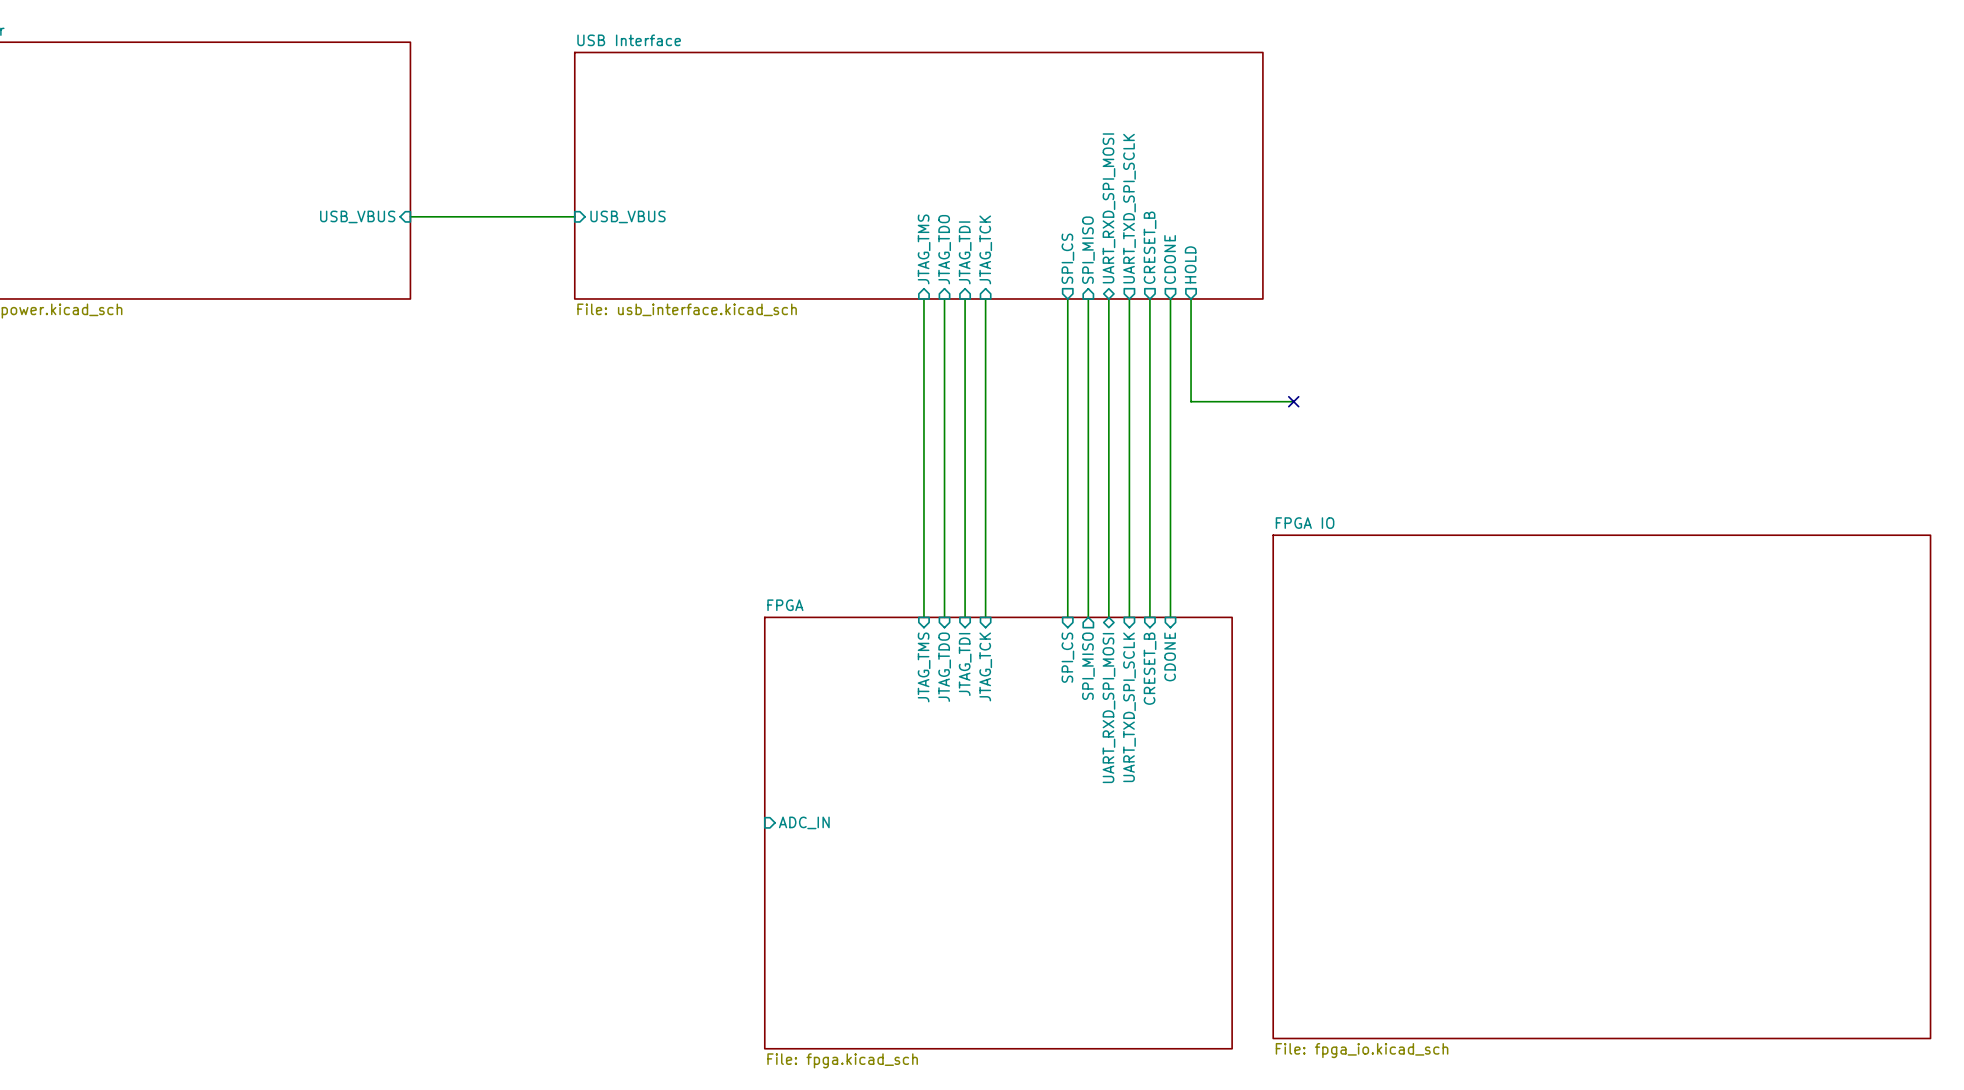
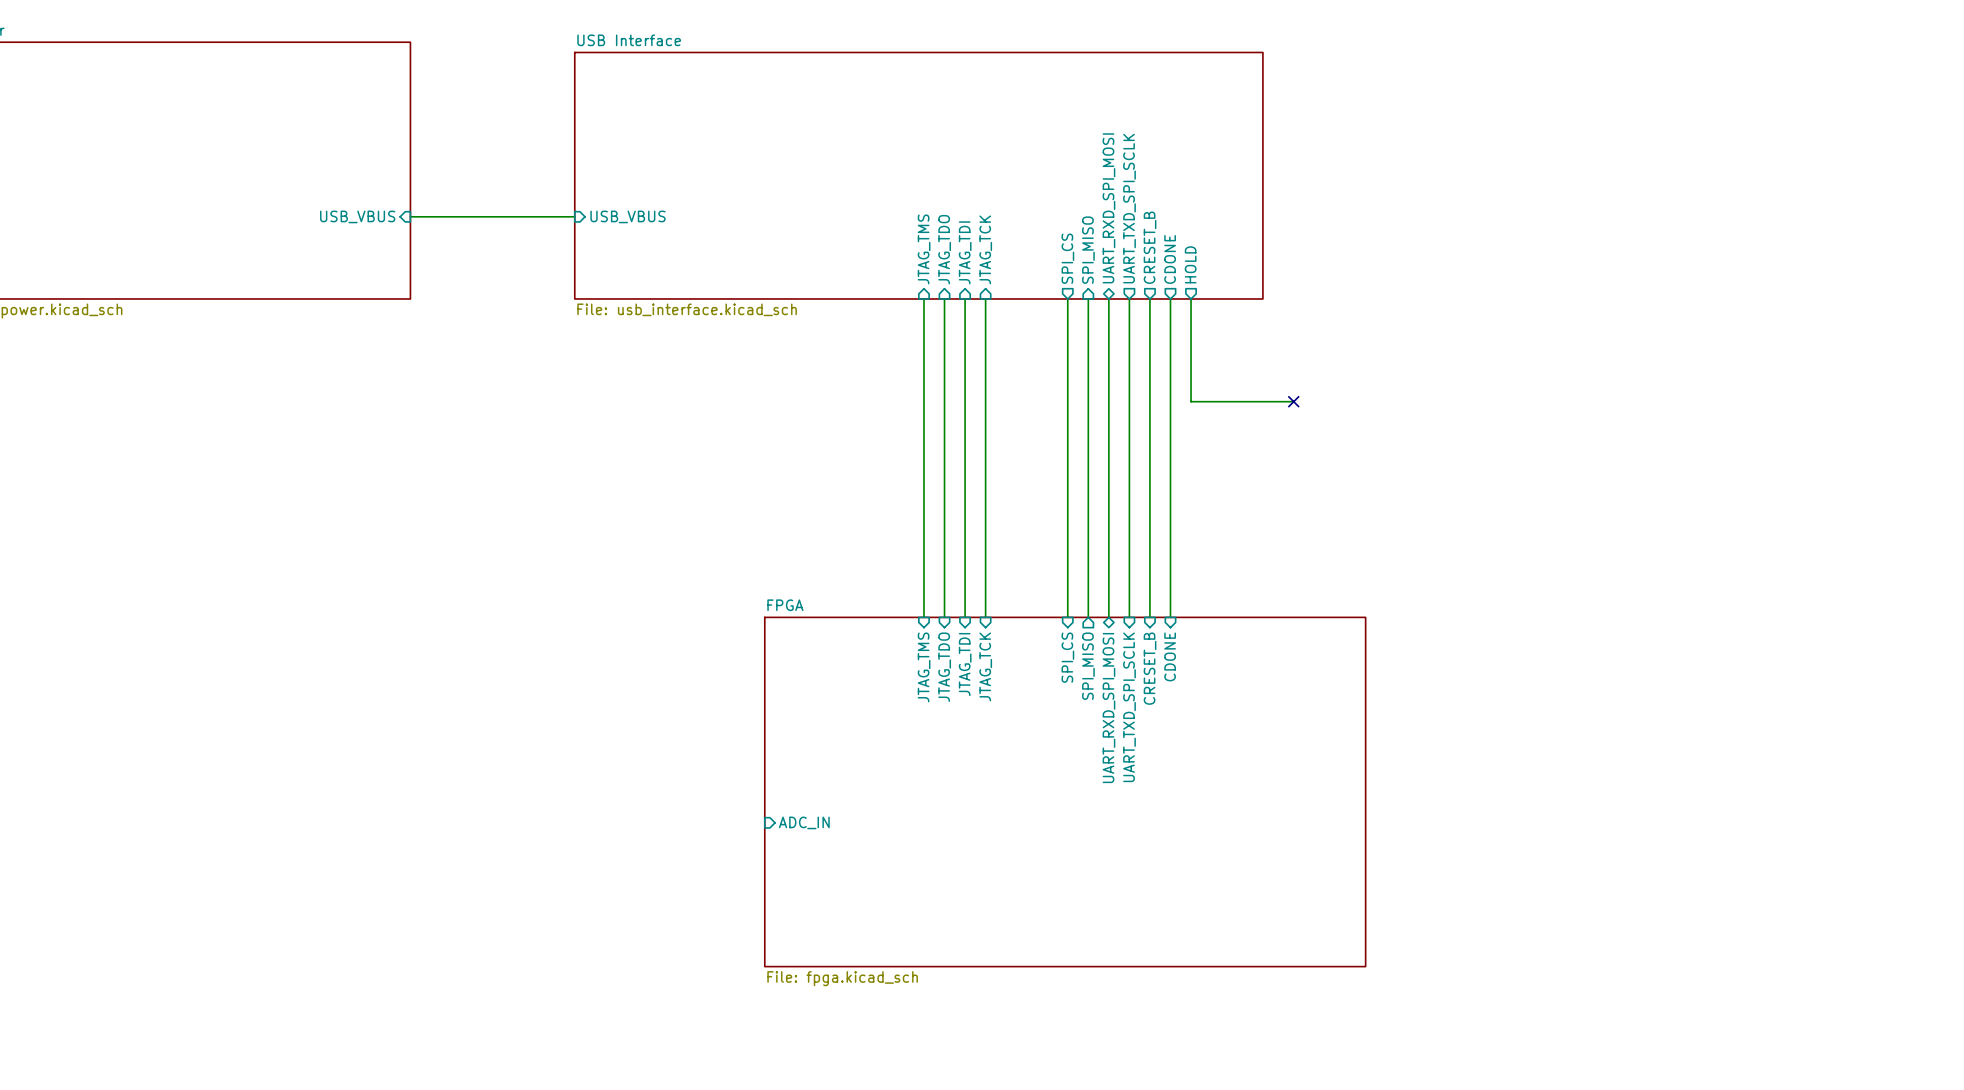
sheet FPGA IO: File: fpga_io.kicad_sch (1601, 786) -> none
sheet FPGA: none -> File: fpga.kicad_sch (1065, 791)
sheet FPGA: File: fpga.kicad_sch (998, 833) -> none

